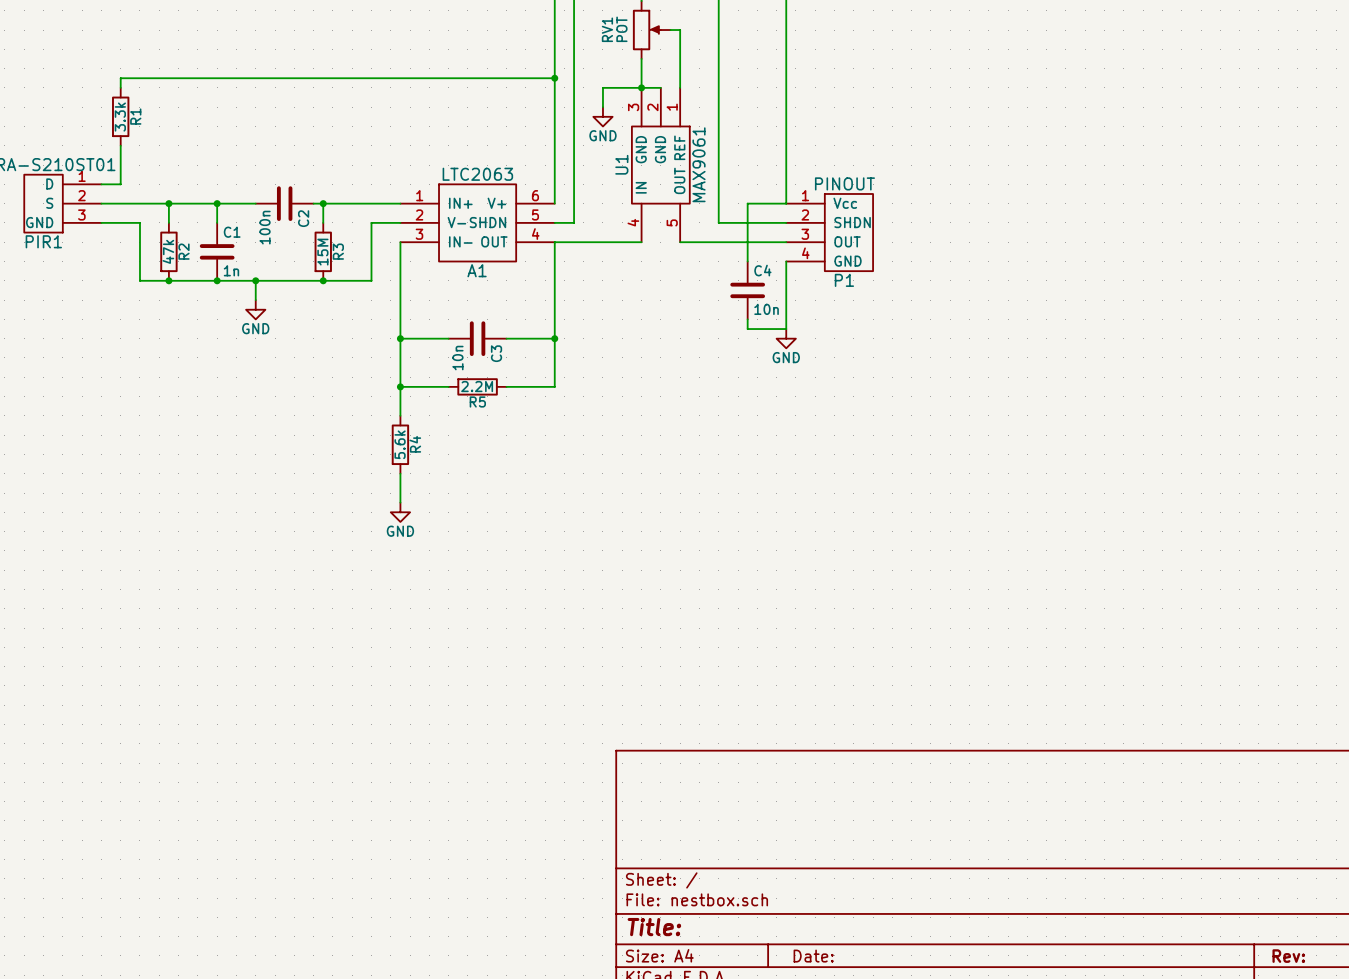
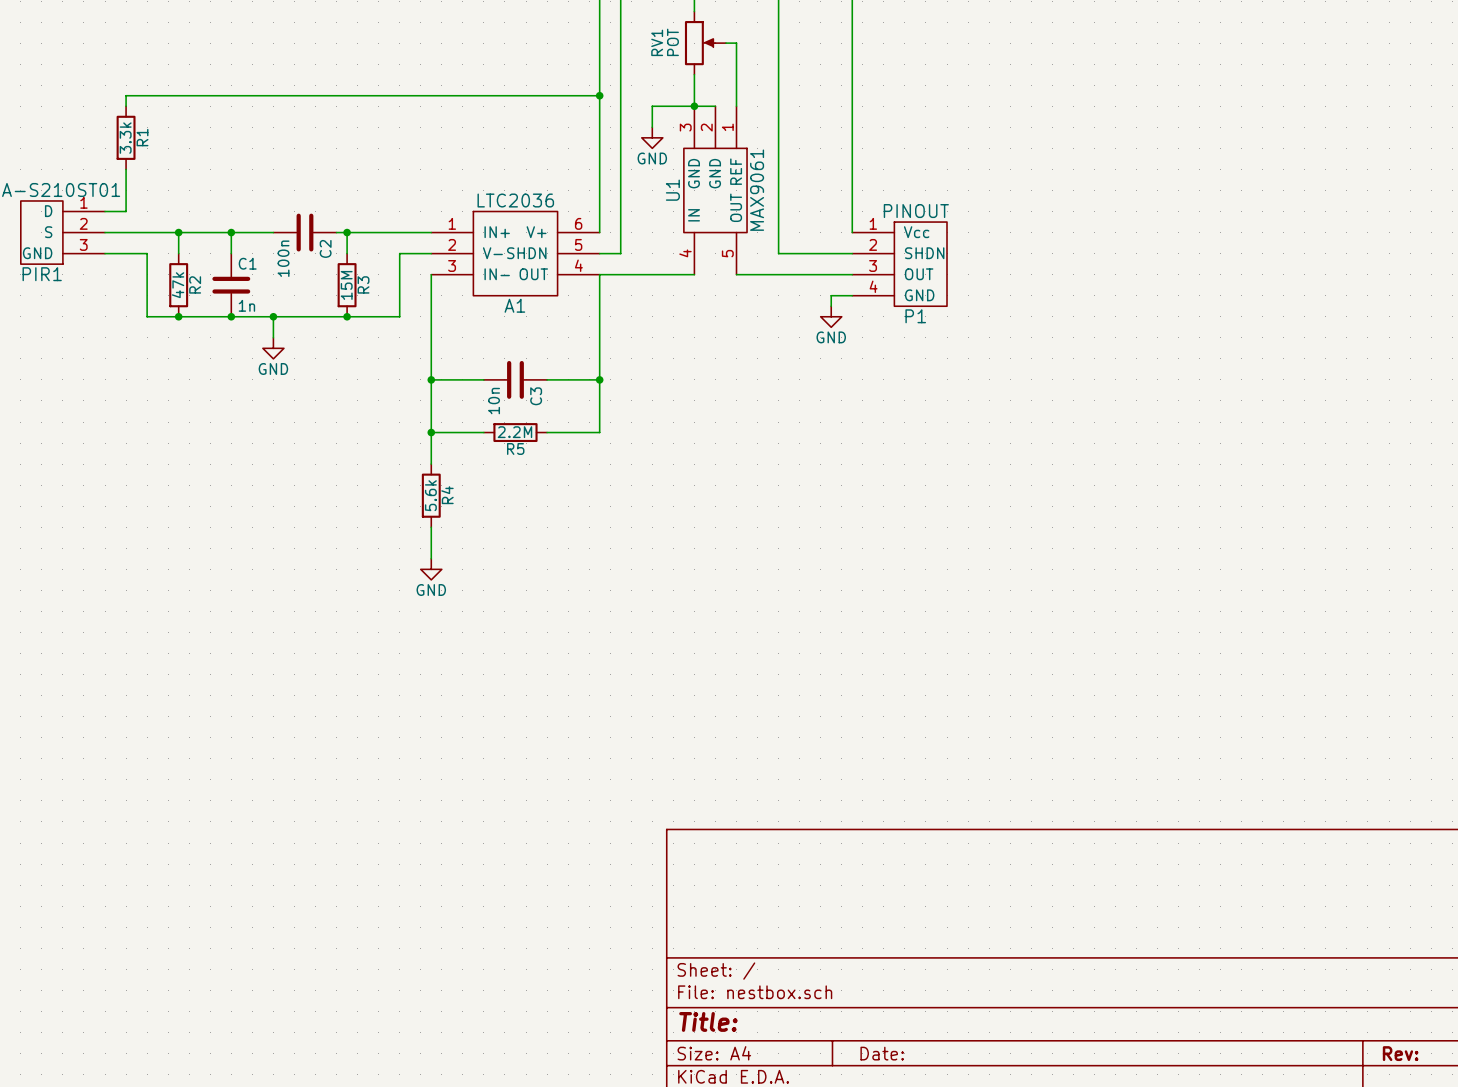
A1 value: LTC2063 (477, 174) -> LTC2036 (515, 200)
wire: (786, 203) (747, 203) (747, 261) -> none
wire: (786, 261) (786, 329) (747, 329) (747, 319) -> (852, 295) (831, 295) (831, 306)
C4: 10n (747, 290) -> none
power symbol position: GND (786, 338) -> GND (831, 316)

